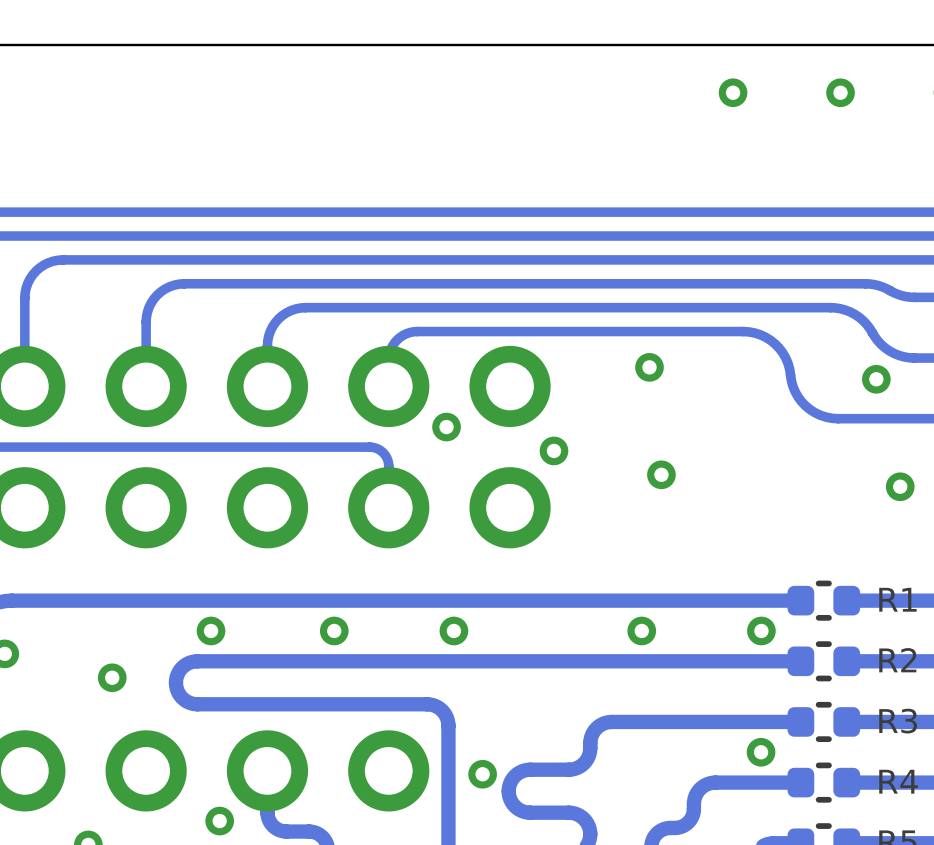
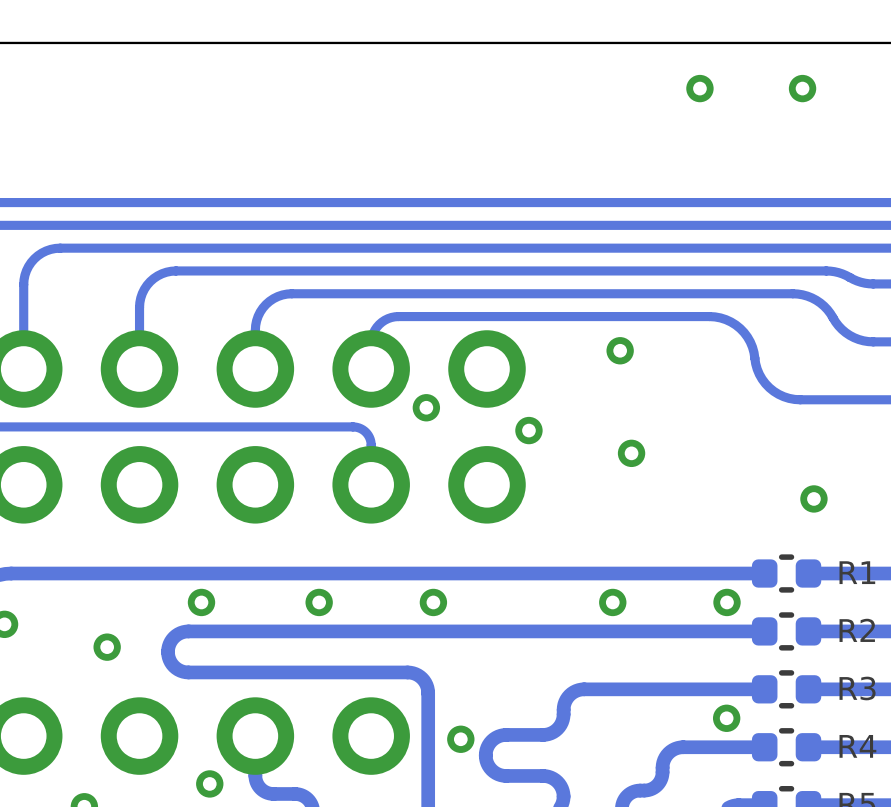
via: (876, 379) -> none
via position: (900, 486) -> (813, 498)

